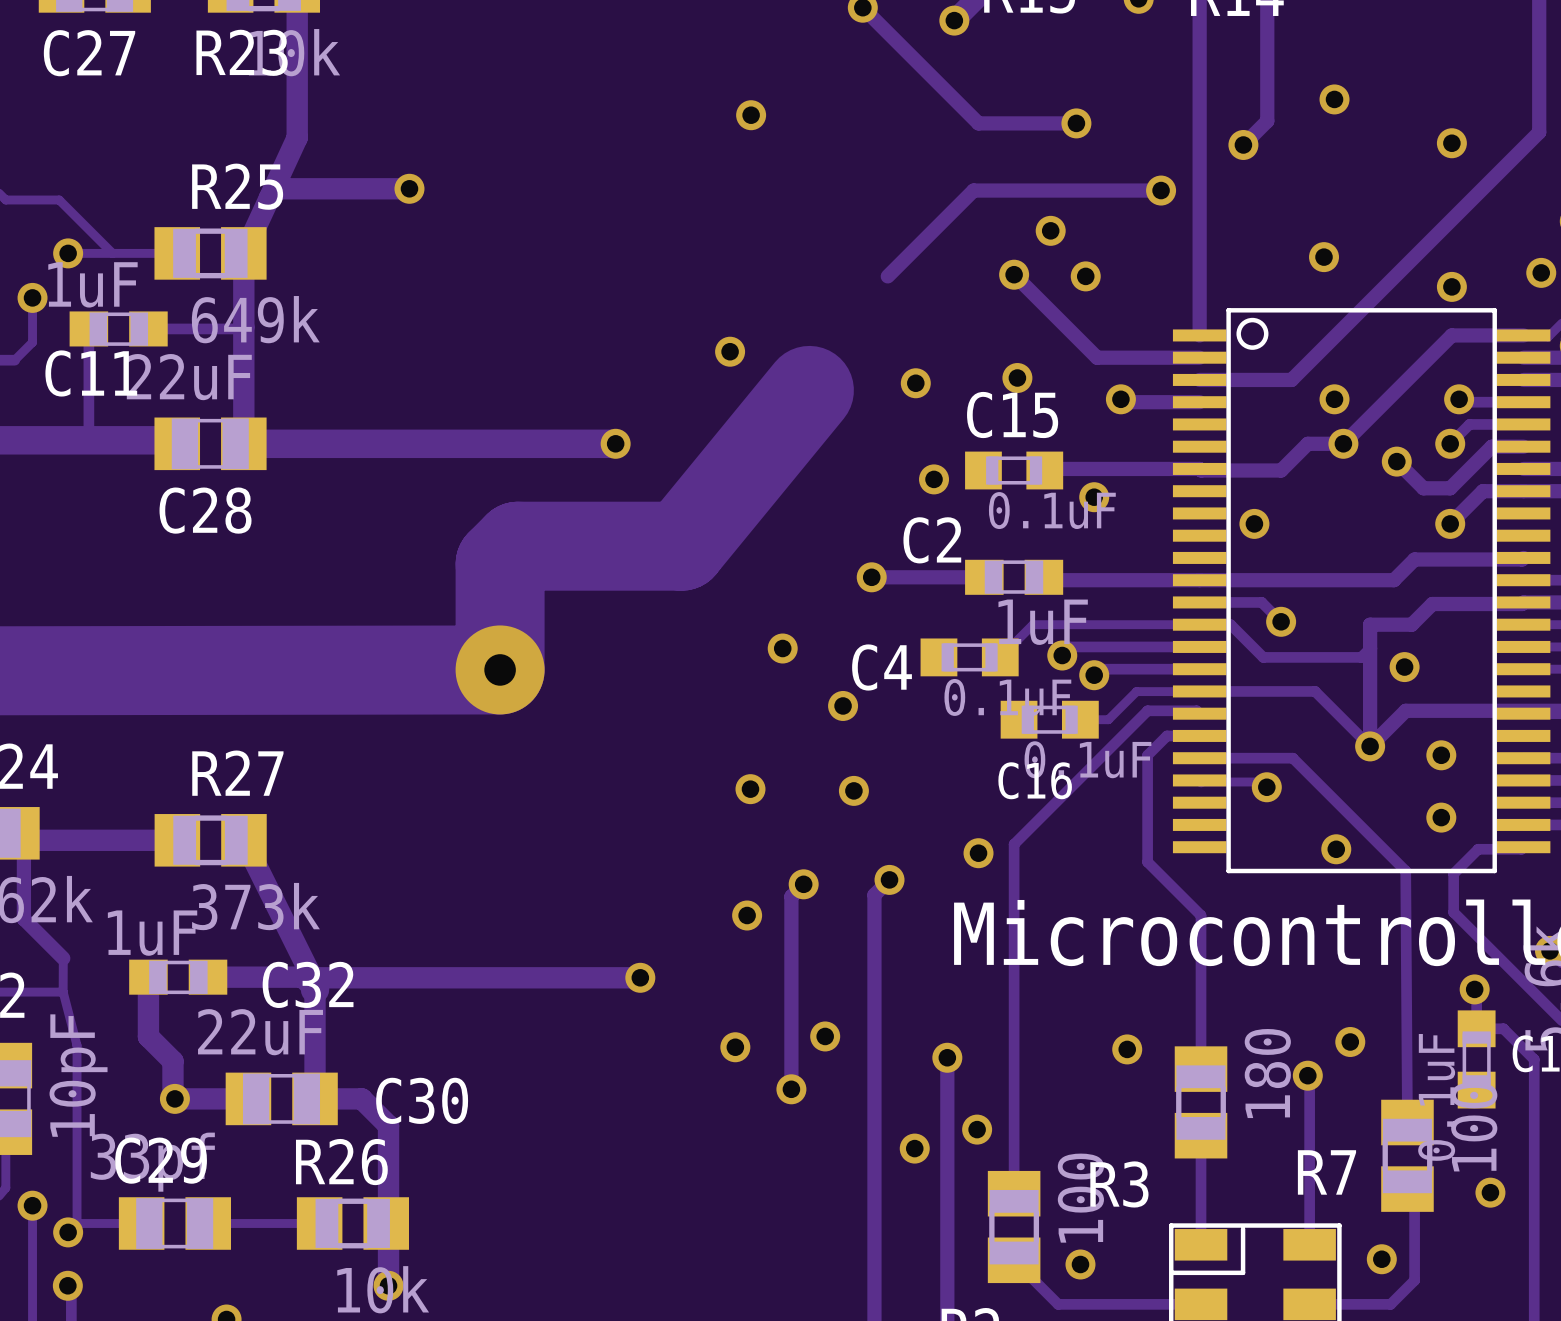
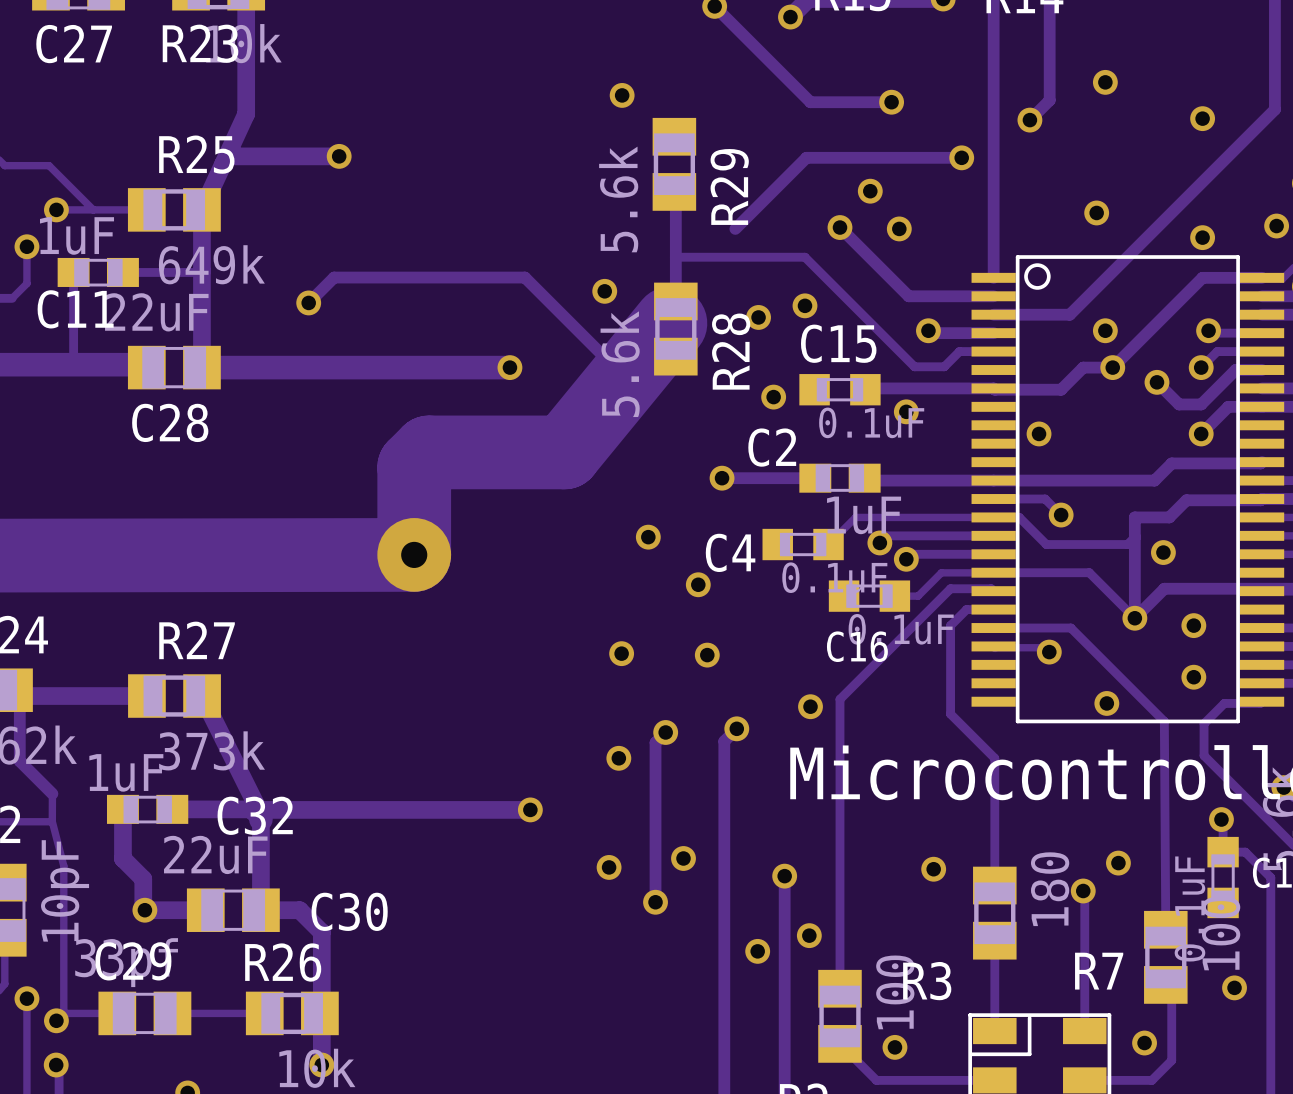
R29: none -> 5.6k (674, 164)
track: none -> (674, 191) (675, 301)
track: none -> (675, 257) (804, 257) (914, 366) (944, 366) (959, 351) (993, 351)
track: none -> (308, 302) (334, 277) (524, 277) (604, 356) (675, 356)
via: none -> (308, 302)
via position: (1017, 378) -> (804, 305)
R28: none -> 5.6k (675, 329)

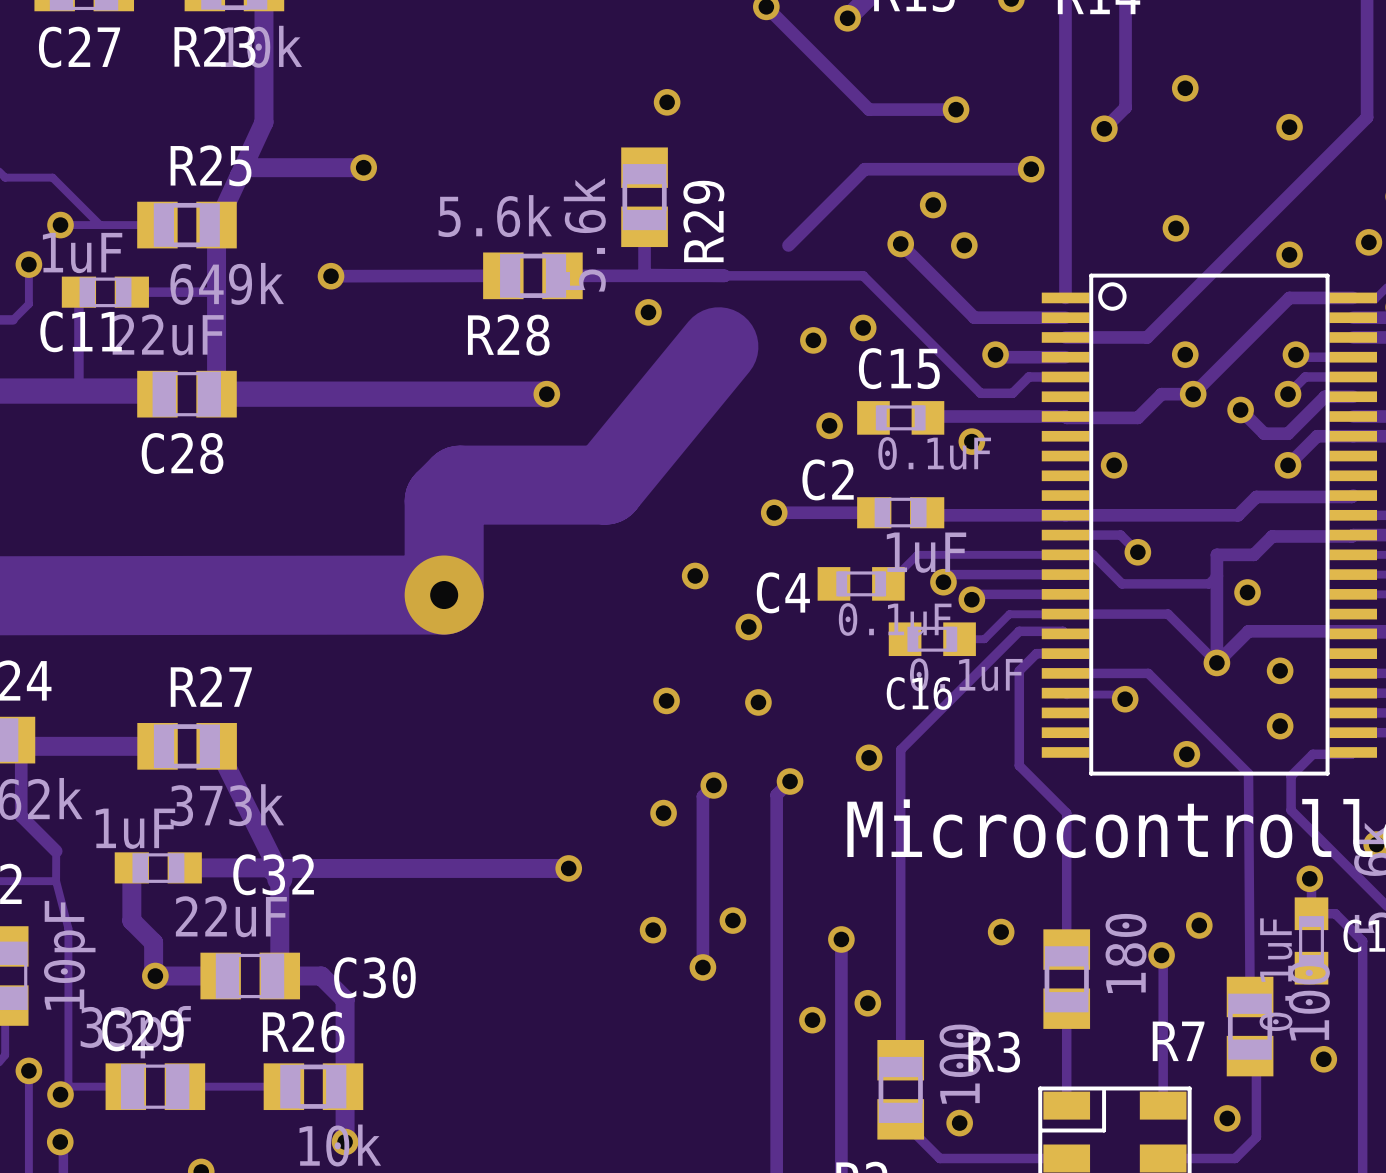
R29 position: (674, 164) -> (644, 197)
track: (674, 191) (675, 301) -> none
track: none -> (644, 226) (644, 275) (724, 275) (562, 275)
track: none -> (503, 275) (331, 276)
track: (308, 302) (334, 277) (524, 277) (604, 356) (675, 356) -> none
via position: (308, 302) -> (331, 276)
R28 rotation: 0° (675, 329) -> 90° clockwise (532, 275)
R28 position: (675, 329) -> (532, 275)

